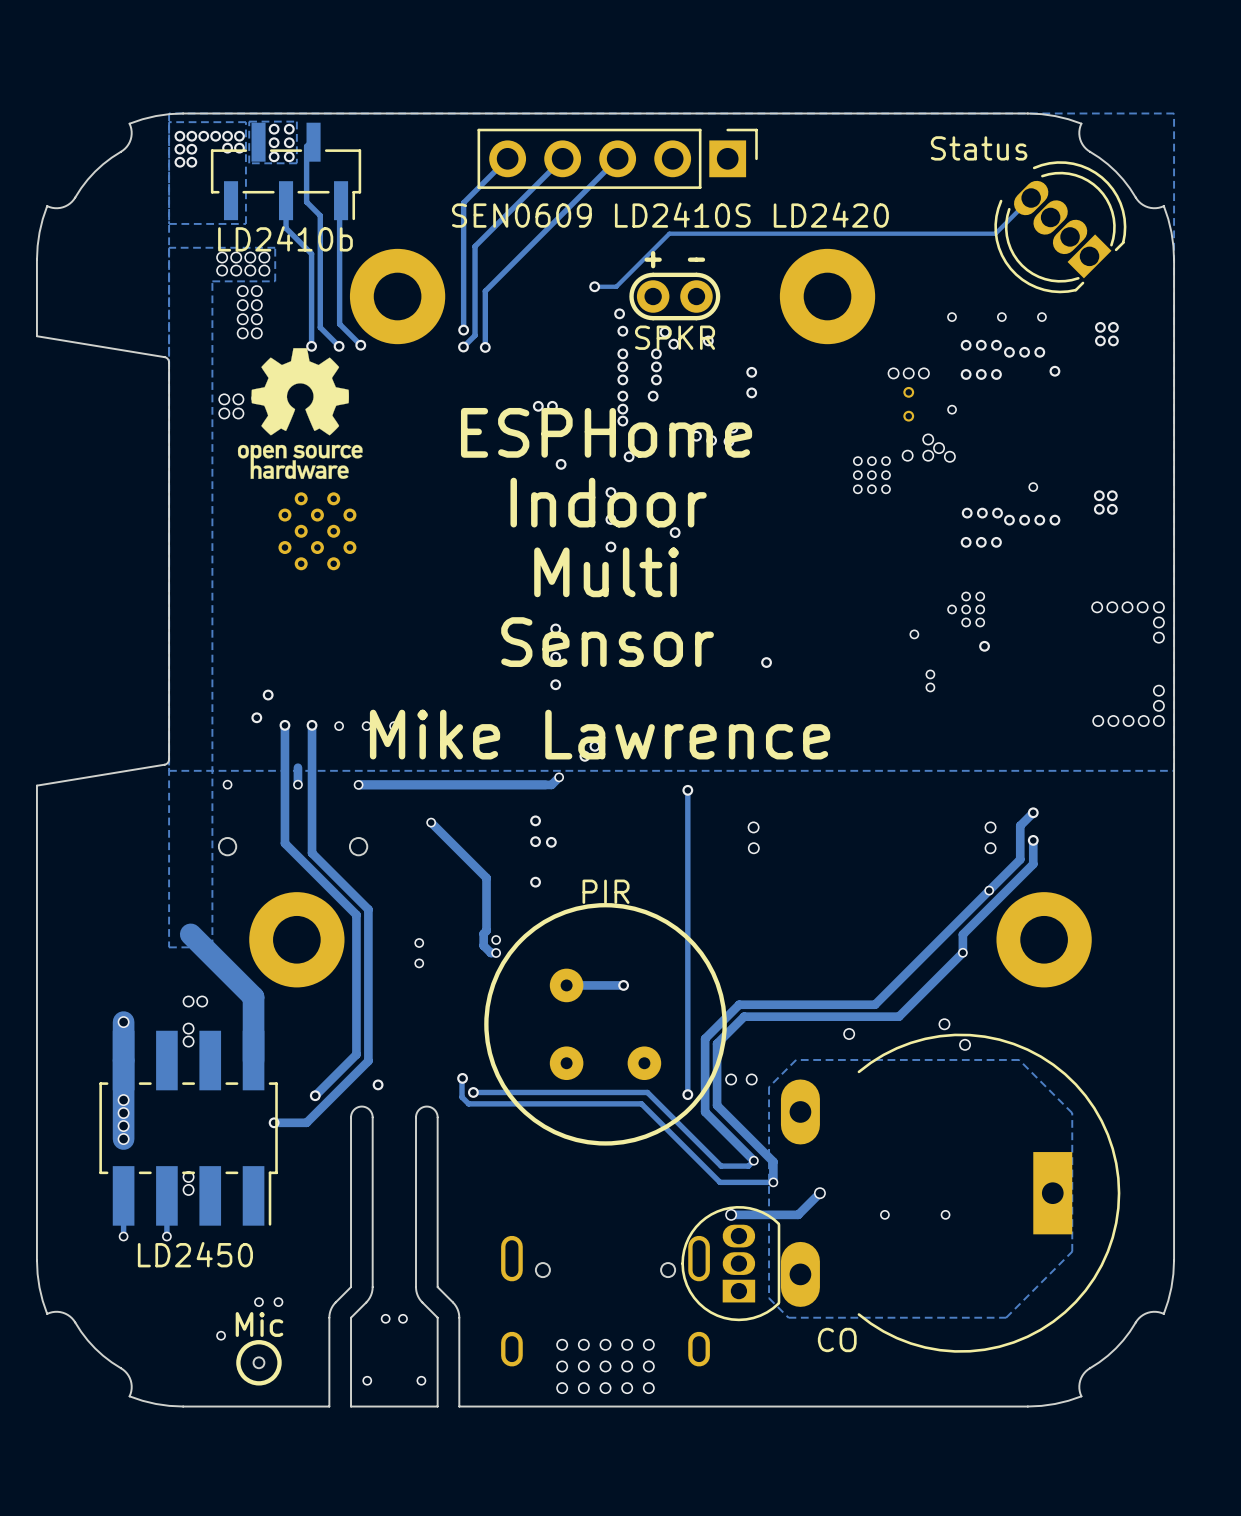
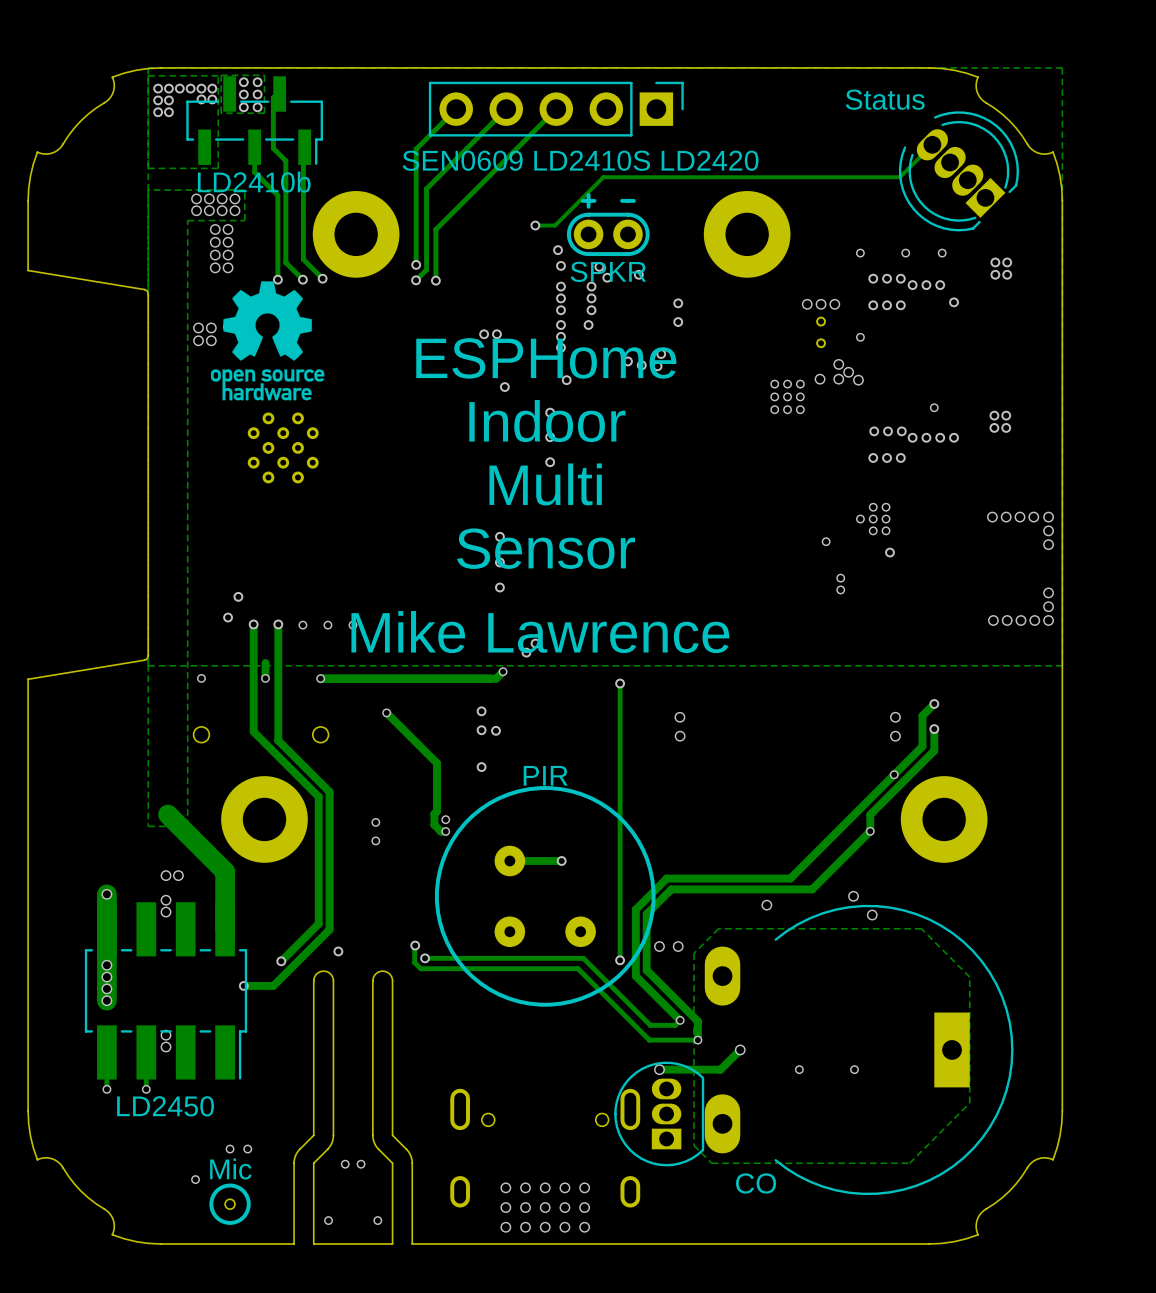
via: (675, 532) -> none
via: (766, 662) -> none

